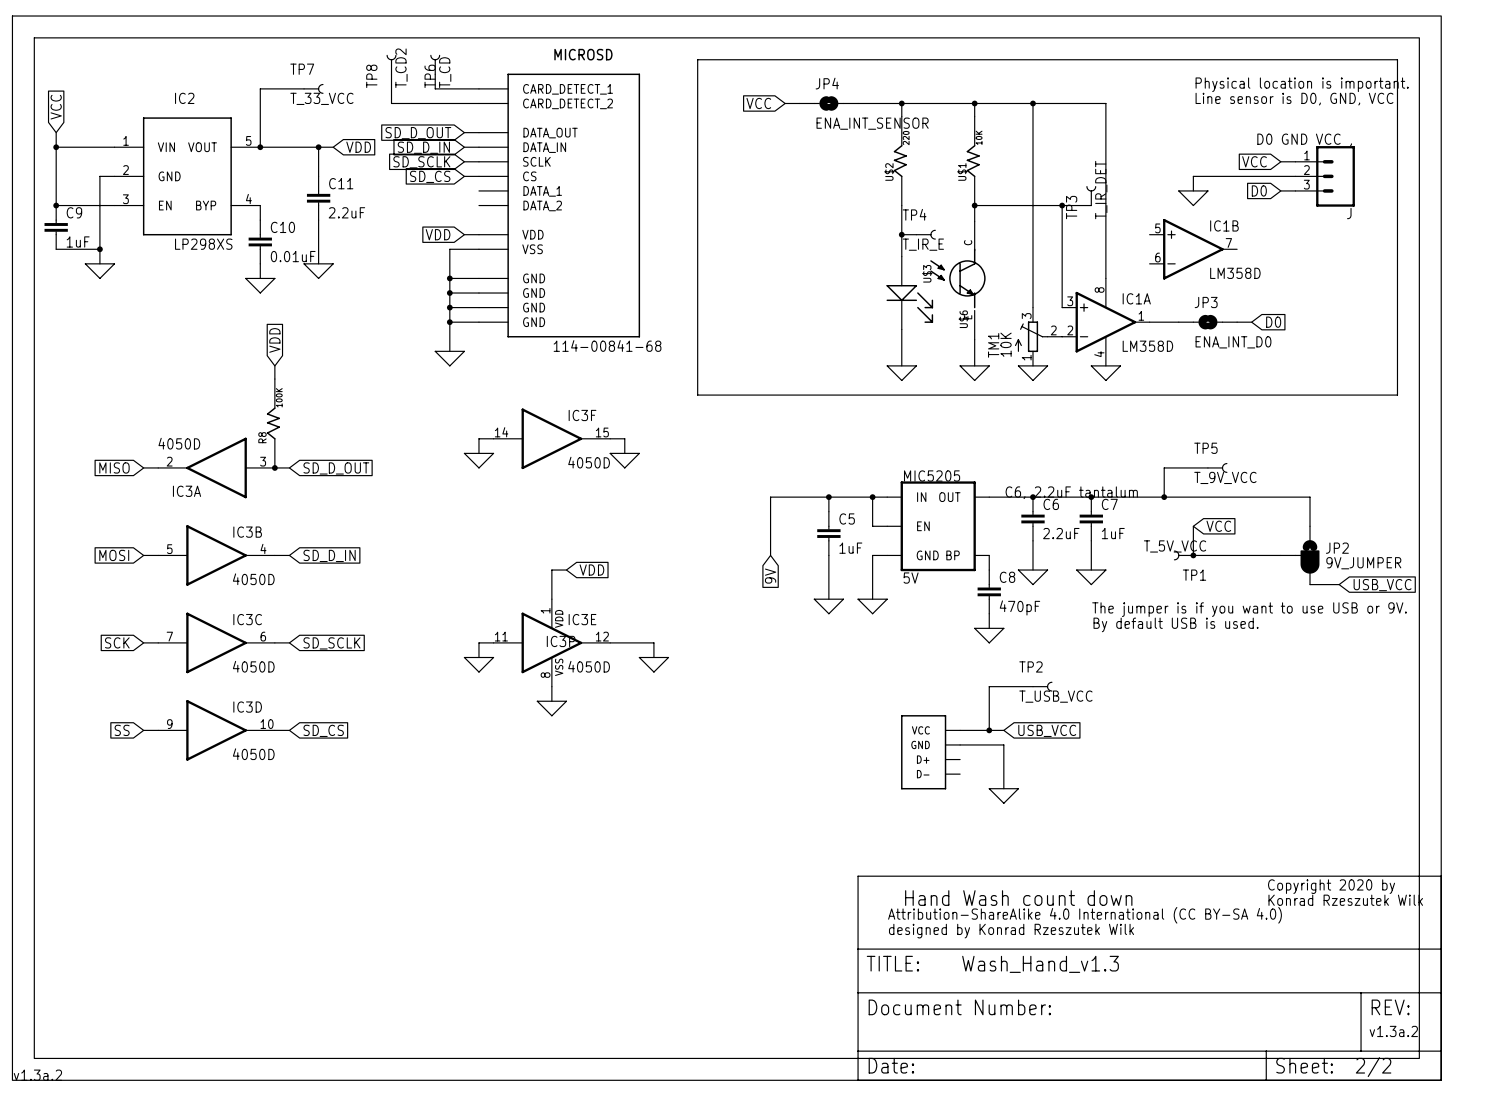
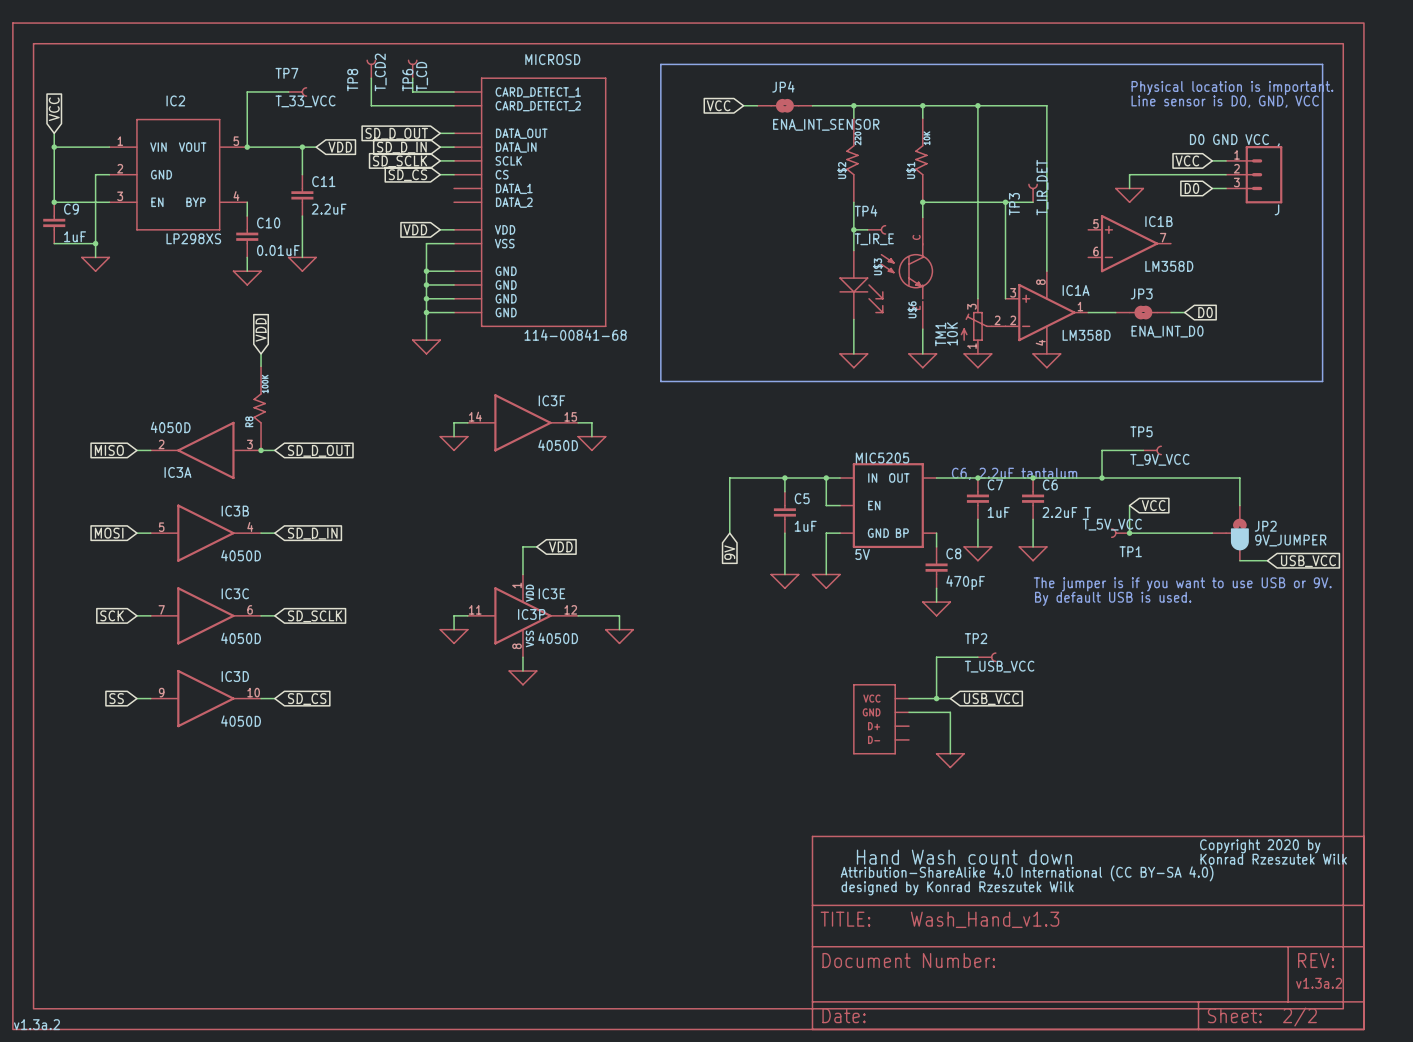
C6 name: C6 (1051, 504) -> C7 (995, 484)
C7 name: C7 (1109, 504) -> C6 (1050, 484)
C6 value: 2.2uF (1061, 533) -> 1uF (998, 512)
C7 value: 1uF (1113, 533) -> 2.2uF T (1066, 512)

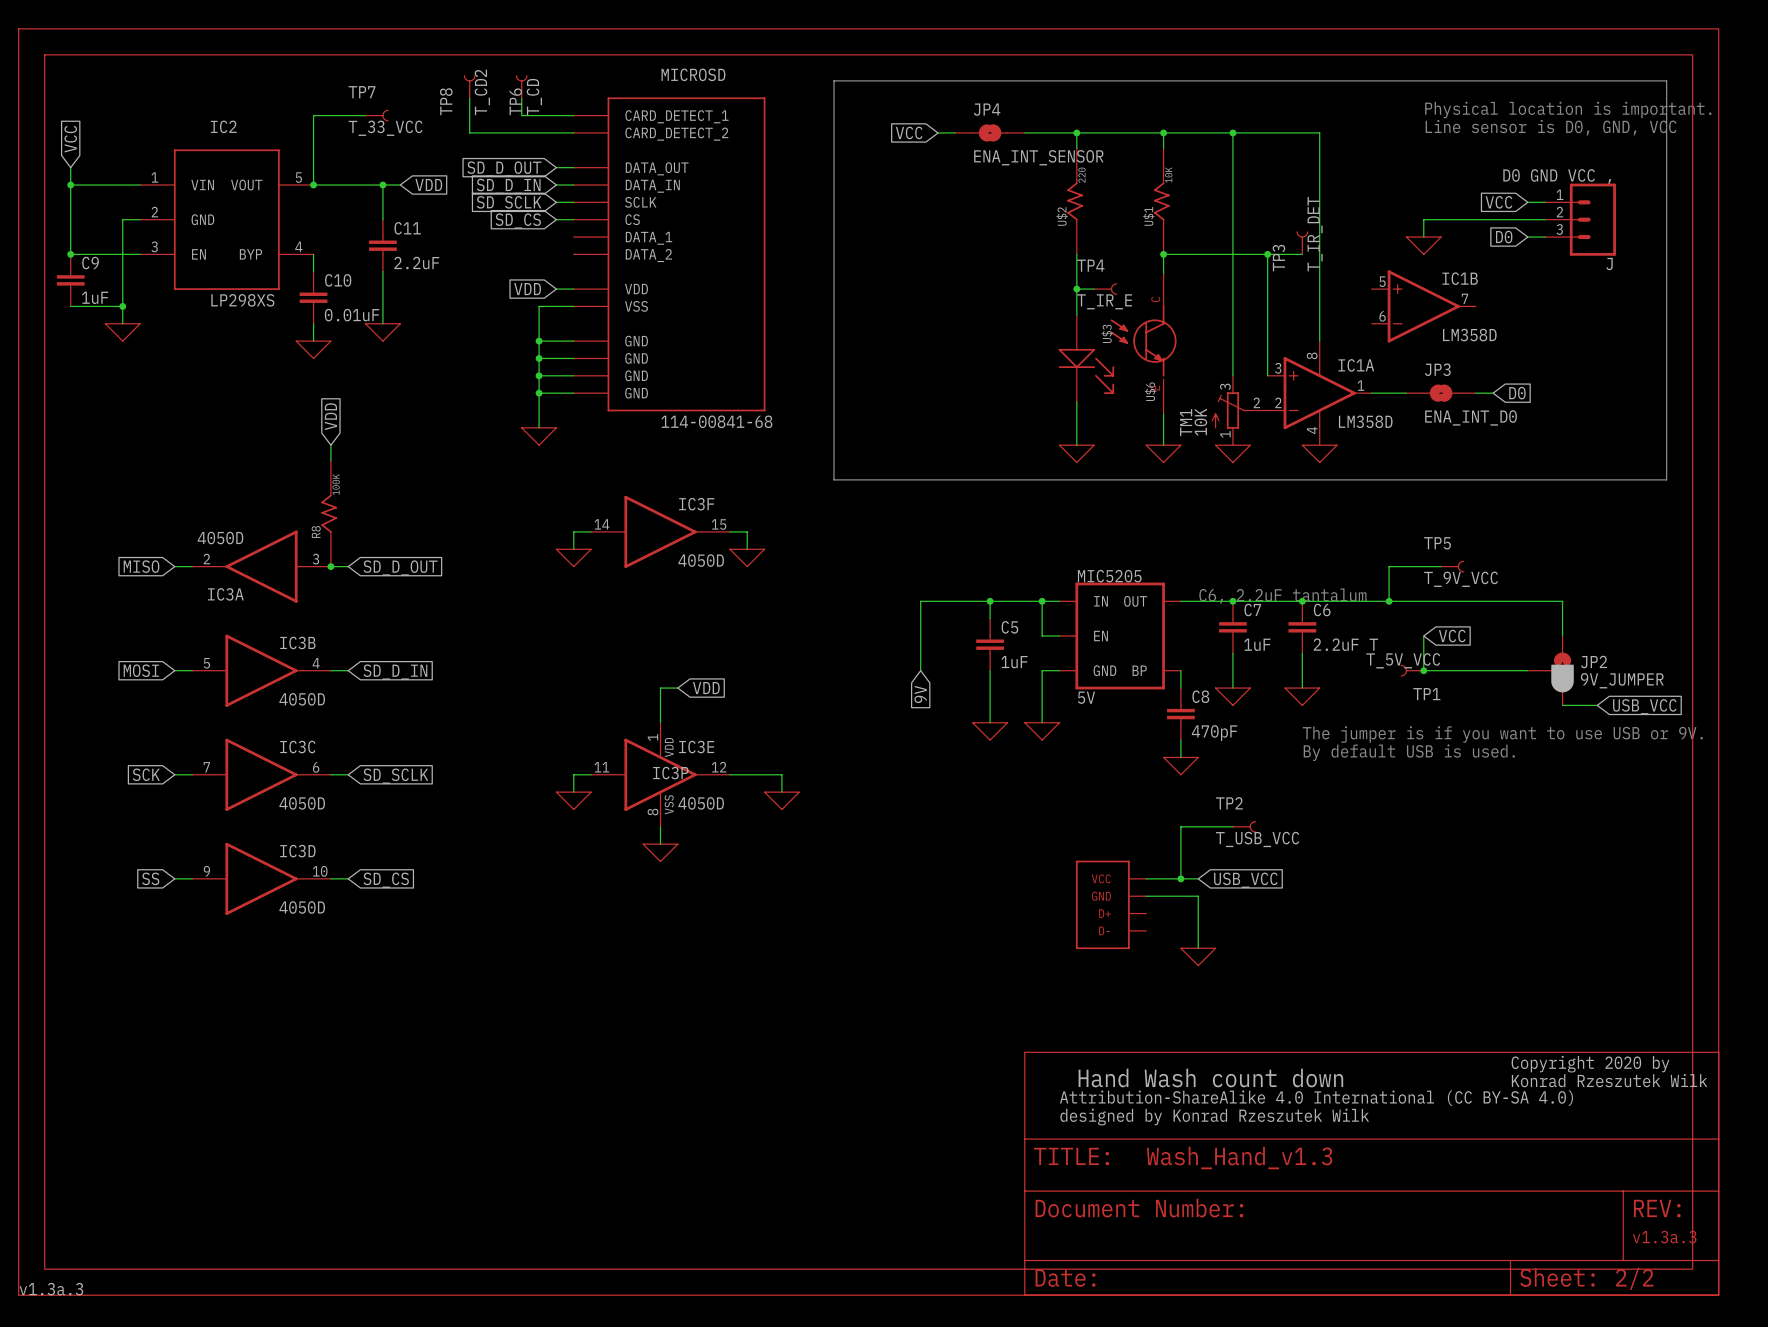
part text: v1.3a.2 (1319, 983) -> v1.3a.3 (1664, 1237)
part text: v1.3a.2 (36, 1024) -> v1.3a.3 (51, 1289)

